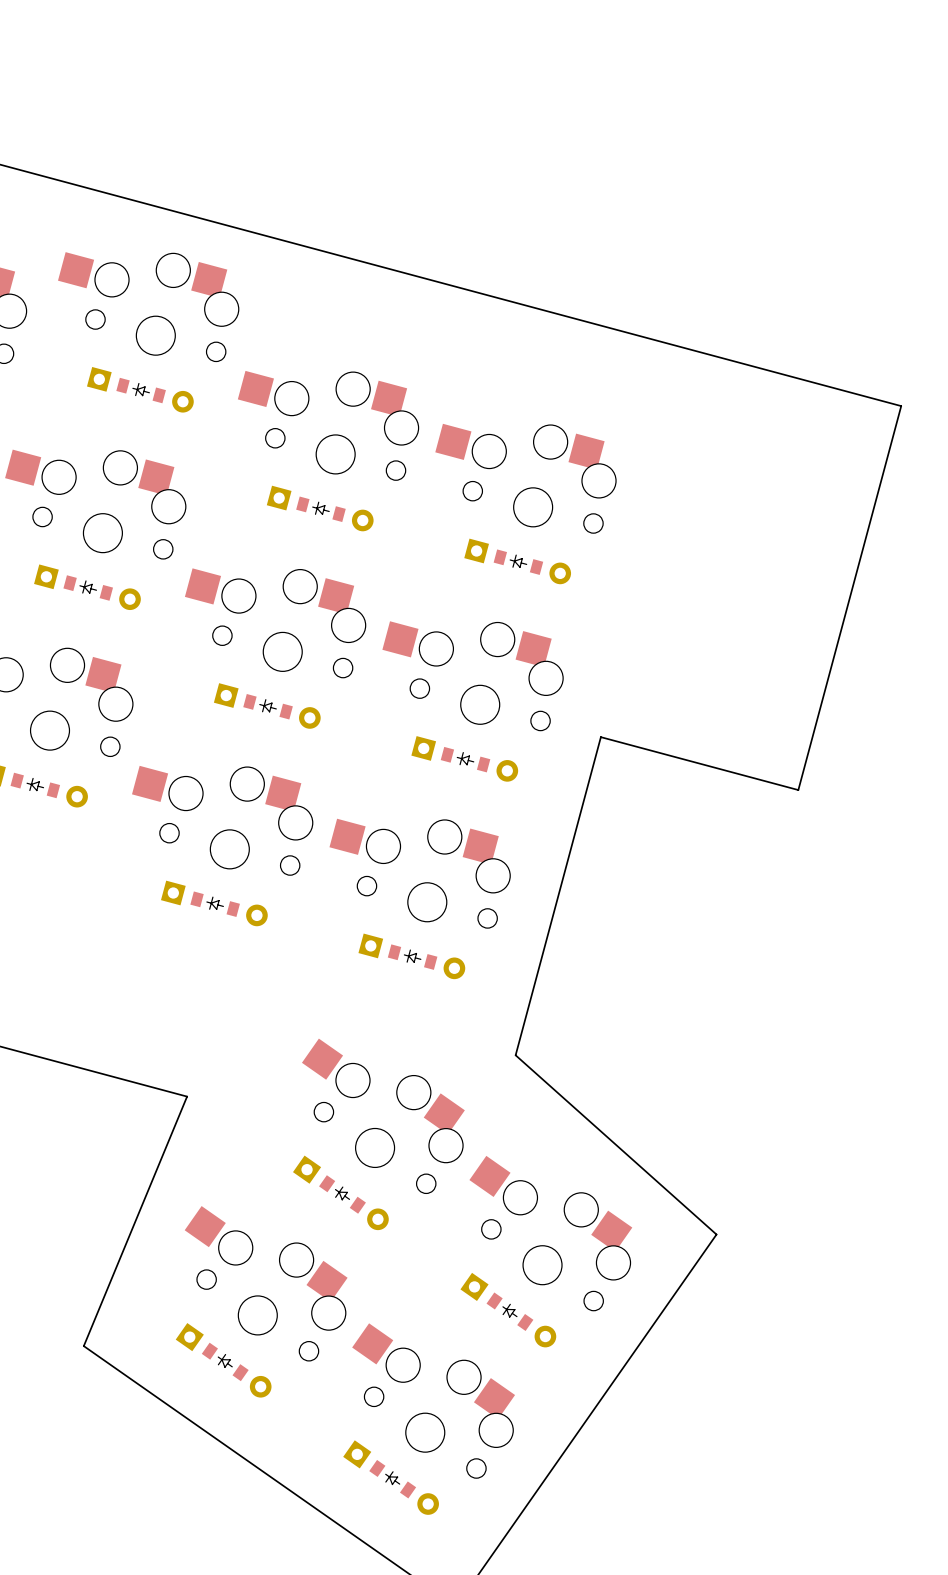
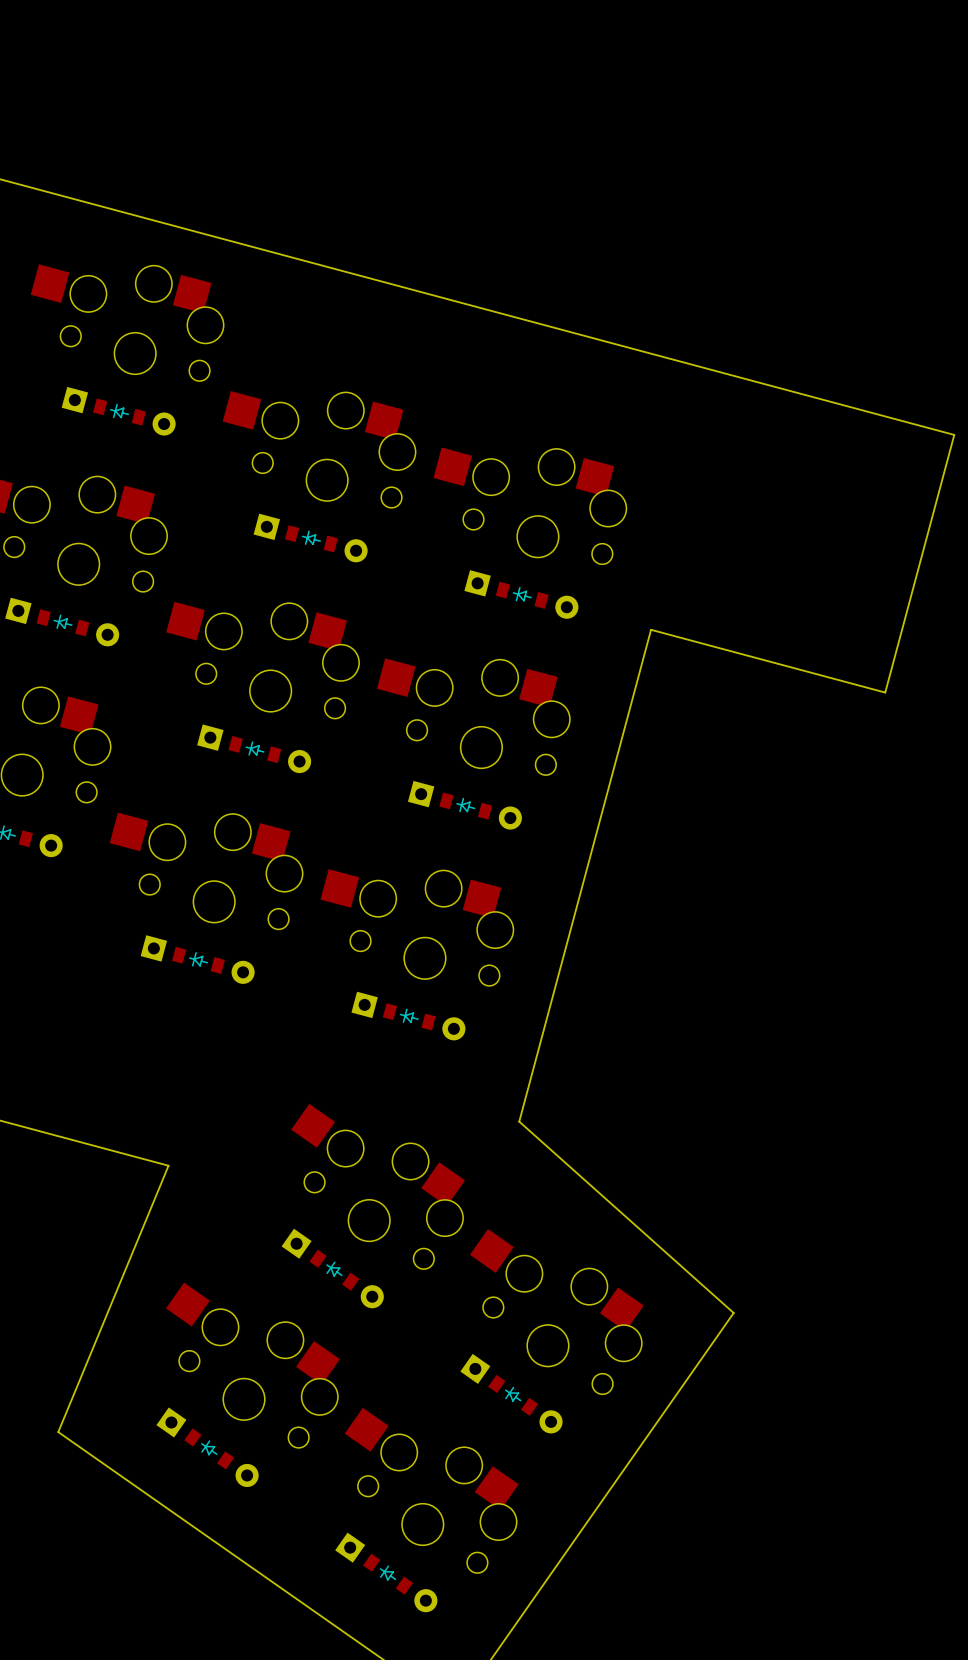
board edge: (901, 406) (798, 790) (600, 737) -> (930, 428) (954, 434) (885, 692) (651, 629) (610, 782)

